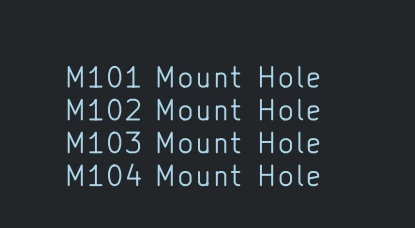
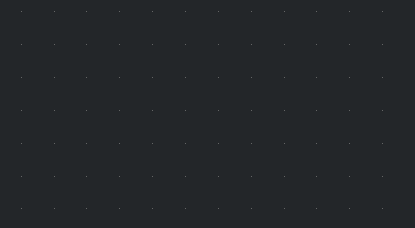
M101: Mount Hole (193, 76) -> none
M102: Mount Hole (193, 109) -> none
M103: Mount Hole (193, 142) -> none
M104: Mount Hole (193, 174) -> none

